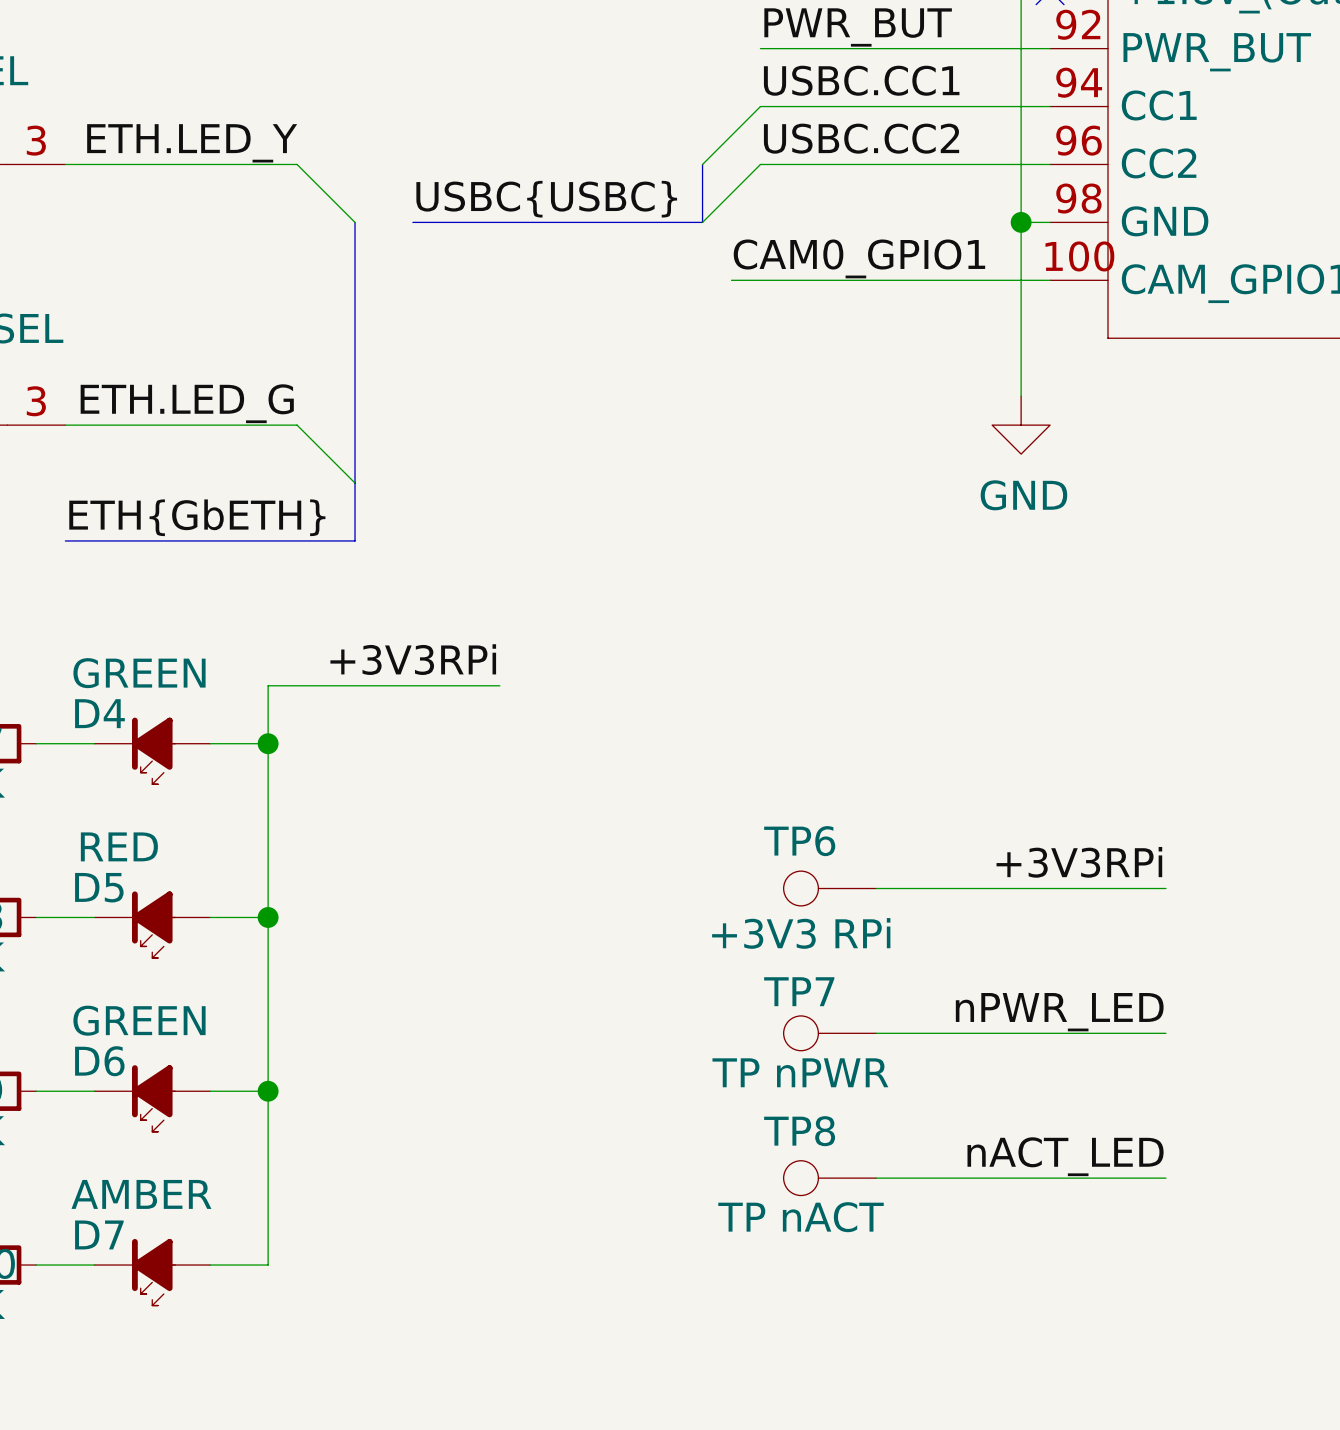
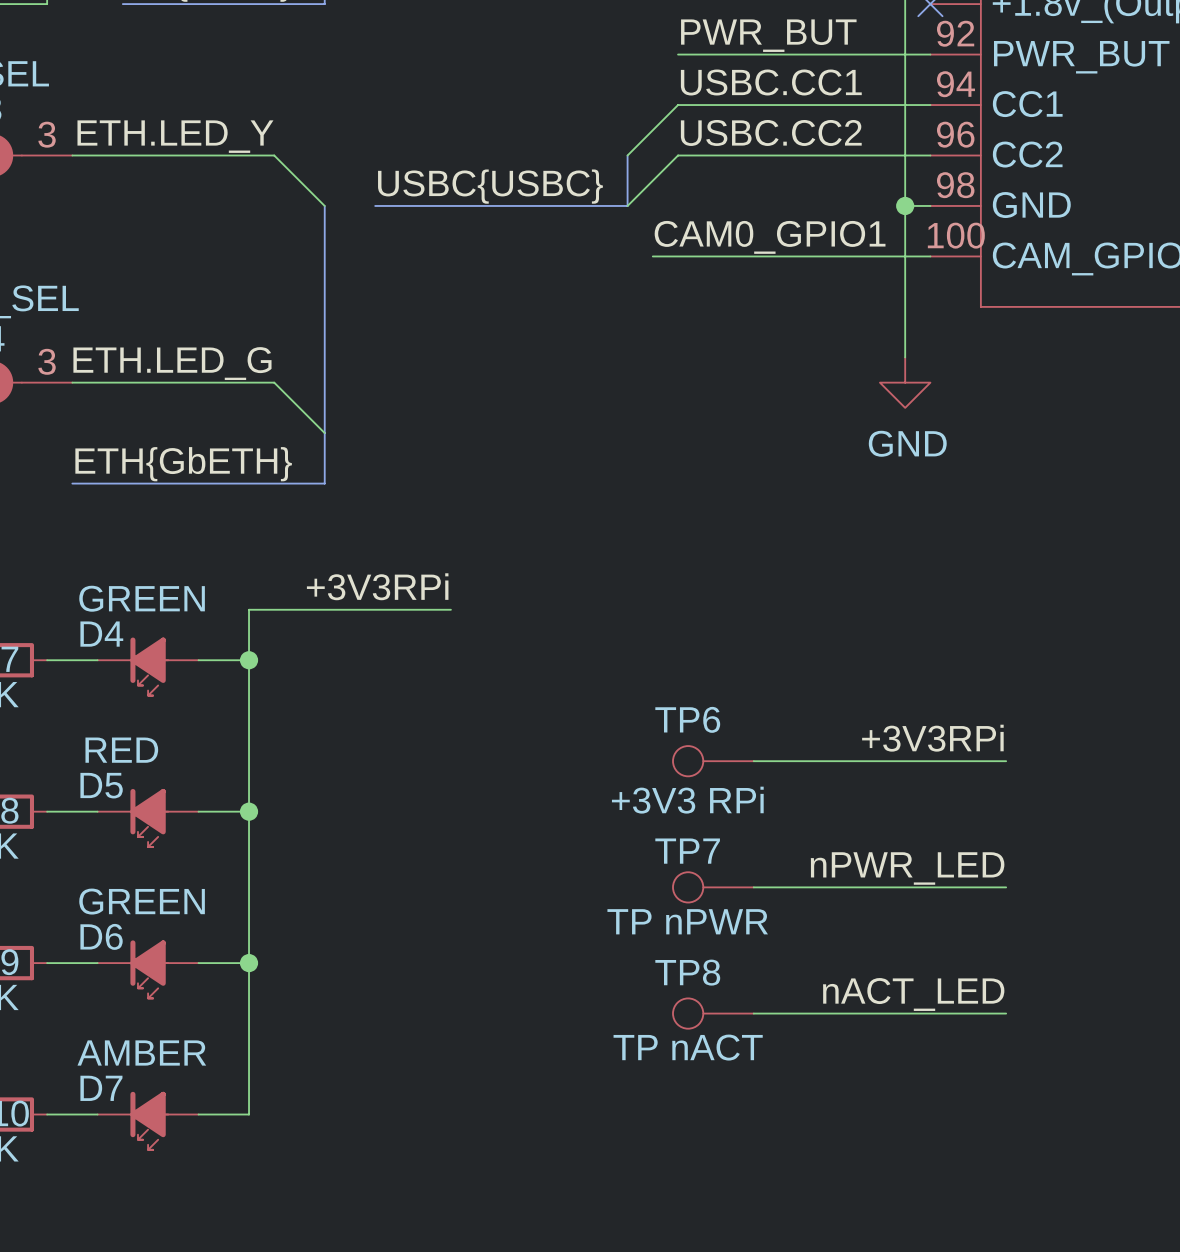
label position: +3V3RPi (1079, 862) -> +3V3RPi (932, 738)
TP6 position: (829, 888) -> (713, 761)
wire: (876, 888) (1165, 888) -> (753, 761) (1006, 761)
label position: nPWR_LED (1059, 1012) -> nPWR_LED (907, 868)
TP7 position: (829, 1033) -> (713, 887)
wire: (876, 1033) (1165, 1033) -> (753, 887) (1006, 887)
label position: nACT_LED (1065, 1156) -> nACT_LED (913, 994)
TP8 position: (829, 1178) -> (713, 1013)
wire: (876, 1178) (1165, 1178) -> (753, 1013) (1006, 1013)

